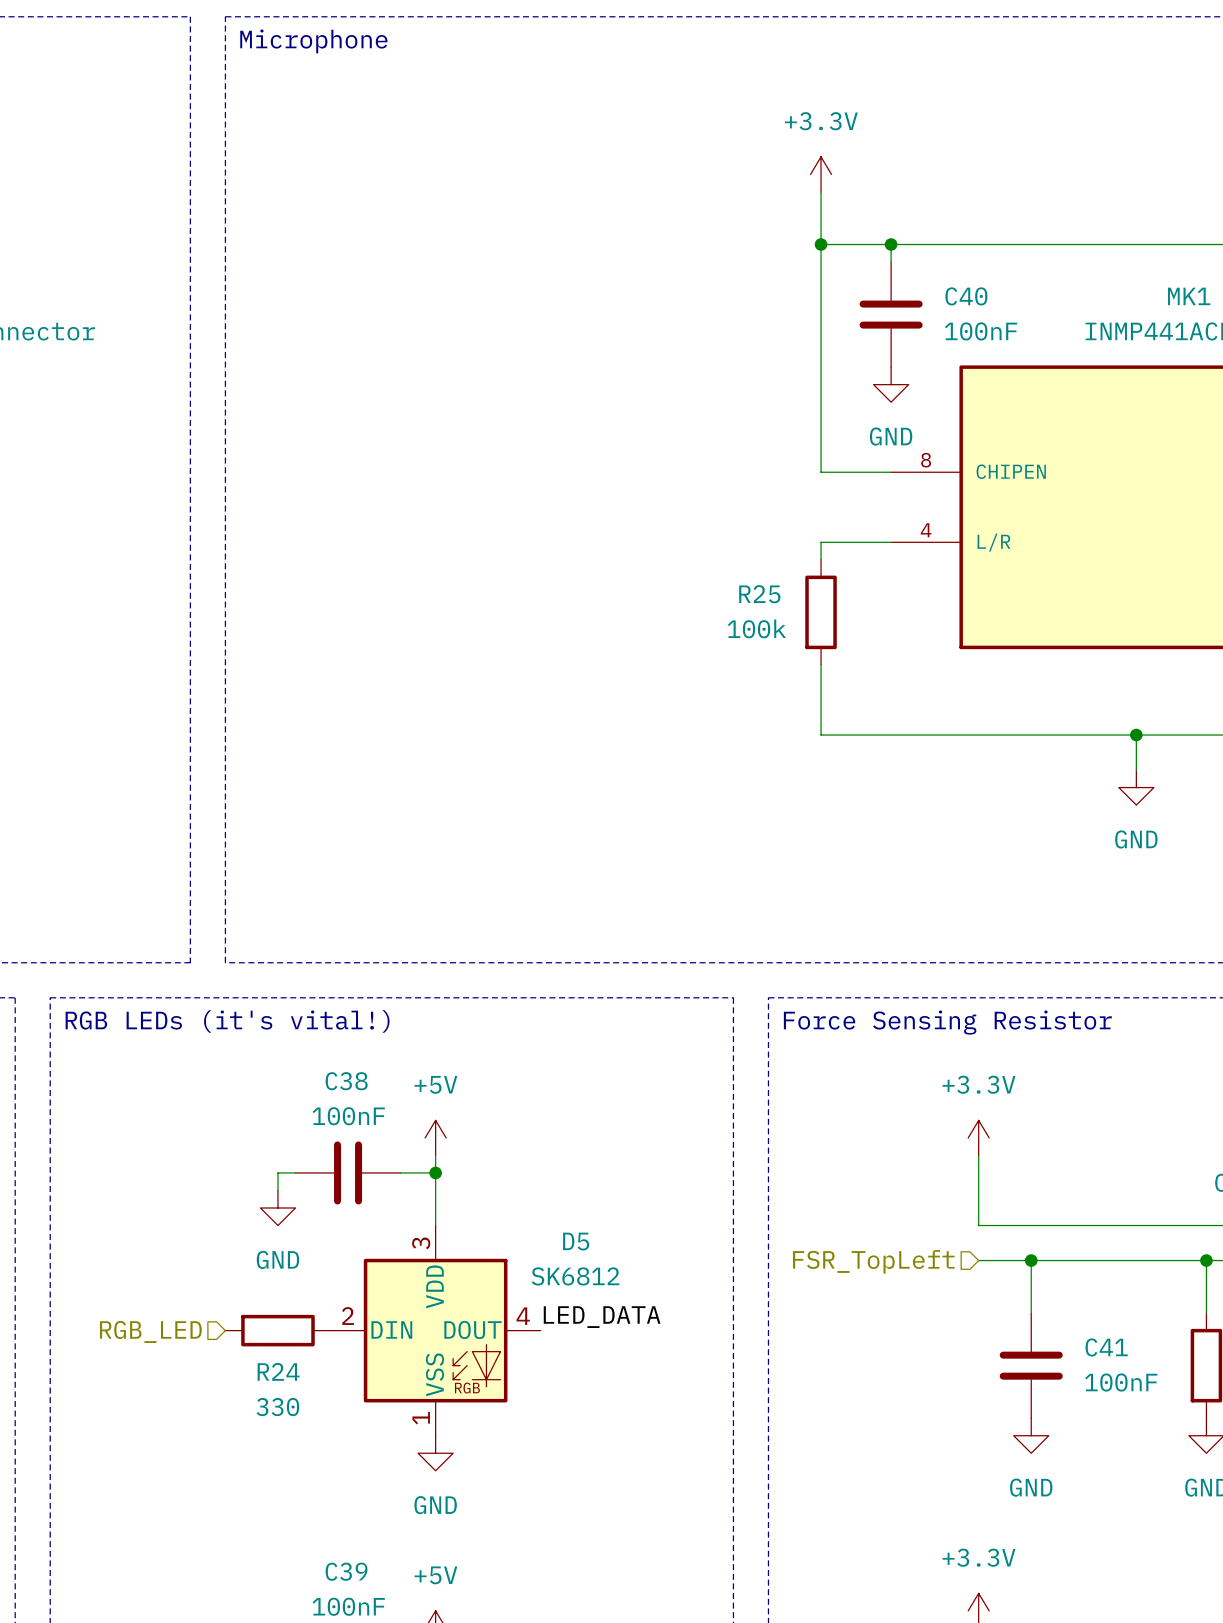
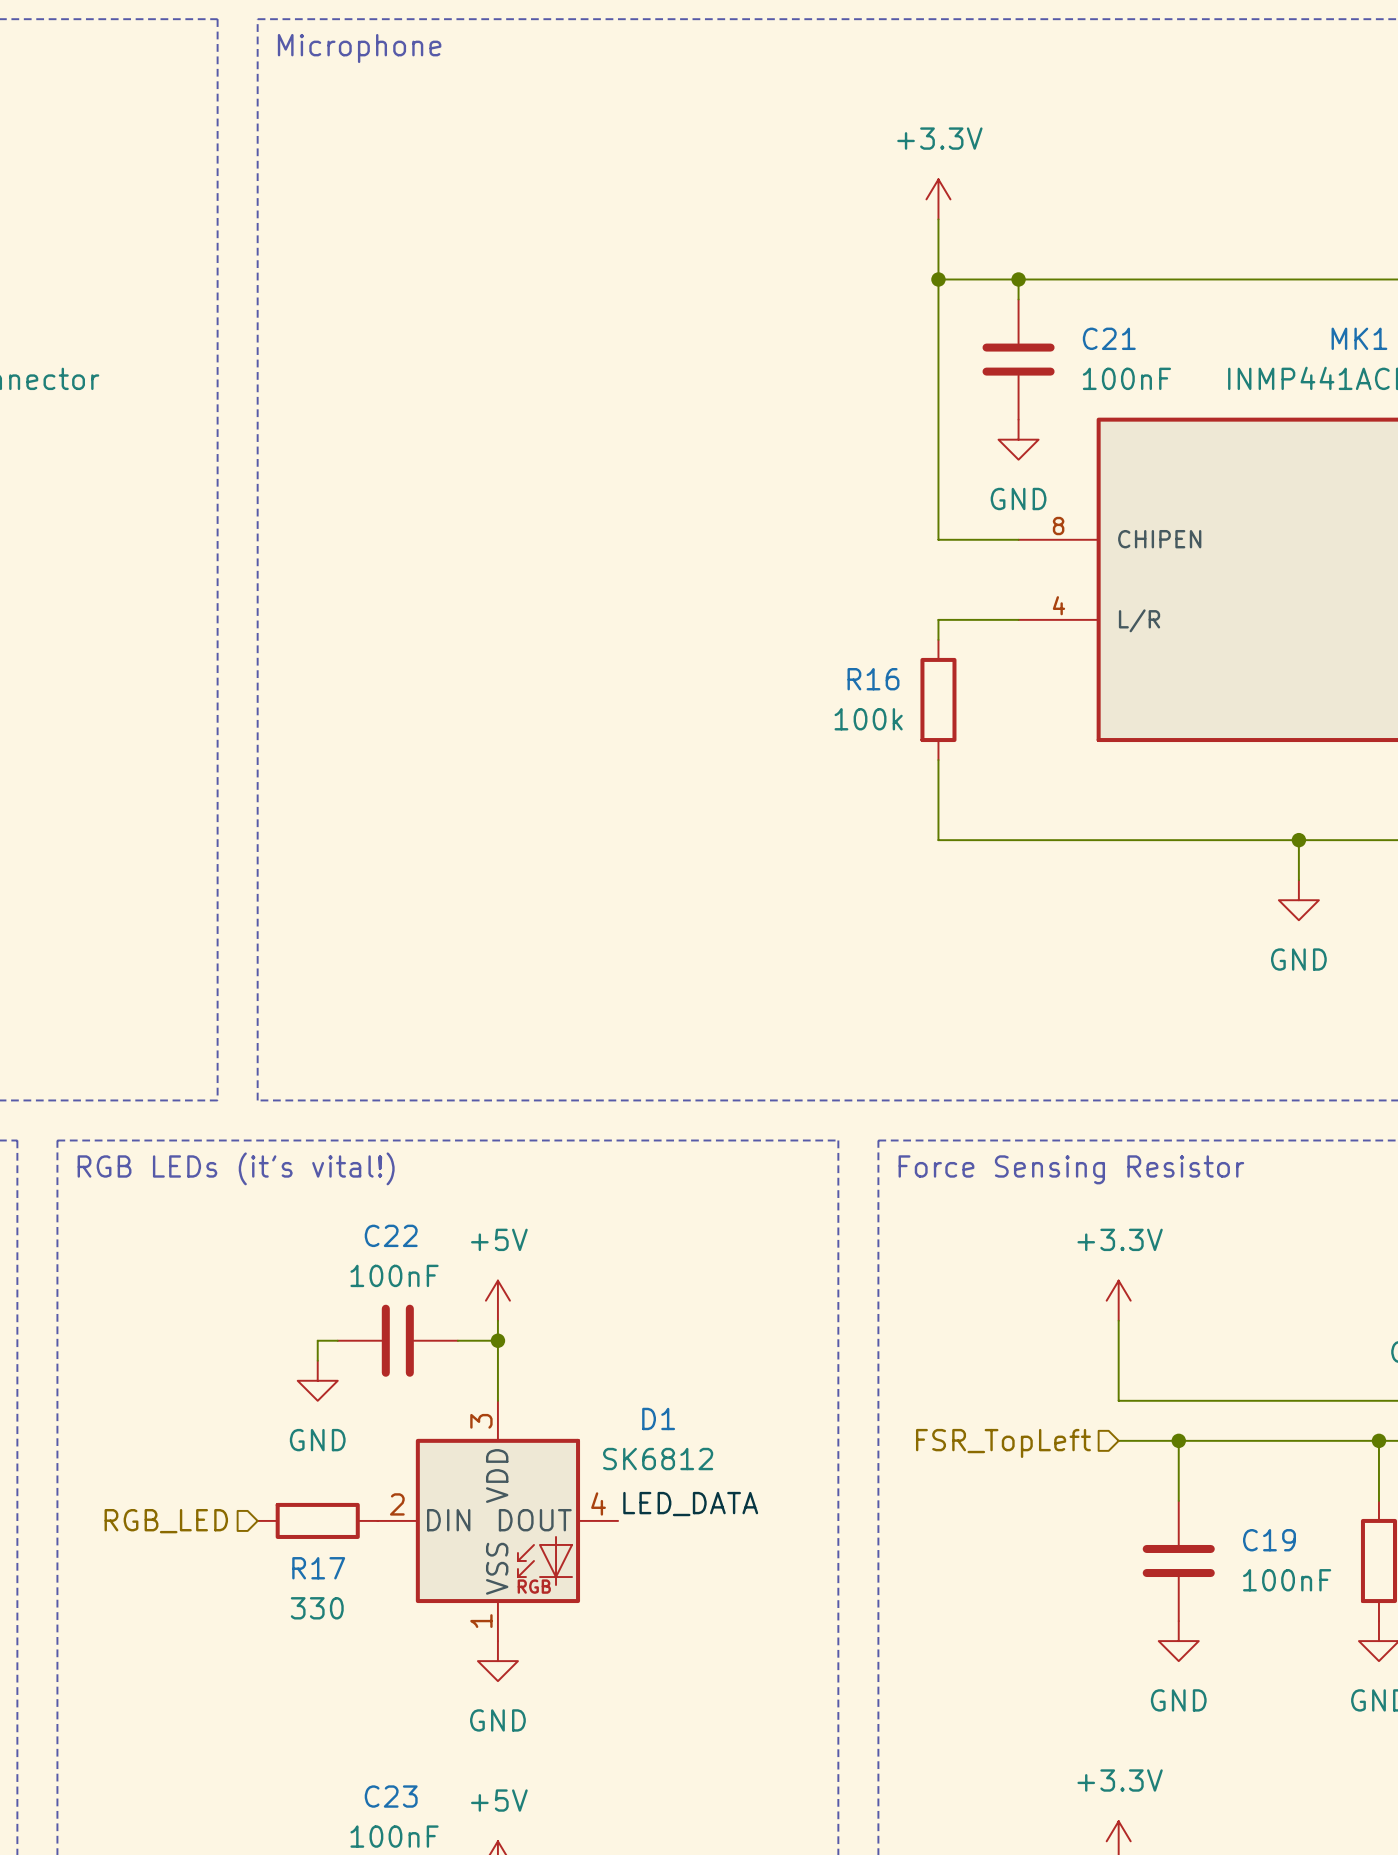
C40 name: C40 (966, 296) -> C21 (1109, 338)
R25 name: R25 (759, 594) -> R16 (873, 679)
C38 name: C38 (346, 1081) -> C22 (391, 1235)
D5 name: D5 (576, 1241) -> D1 (658, 1418)
C41 name: C41 (1106, 1347) -> C19 (1269, 1540)
R24 name: R24 (278, 1371) -> R17 (318, 1568)
C39 name: C39 (346, 1571) -> C23 (391, 1796)

